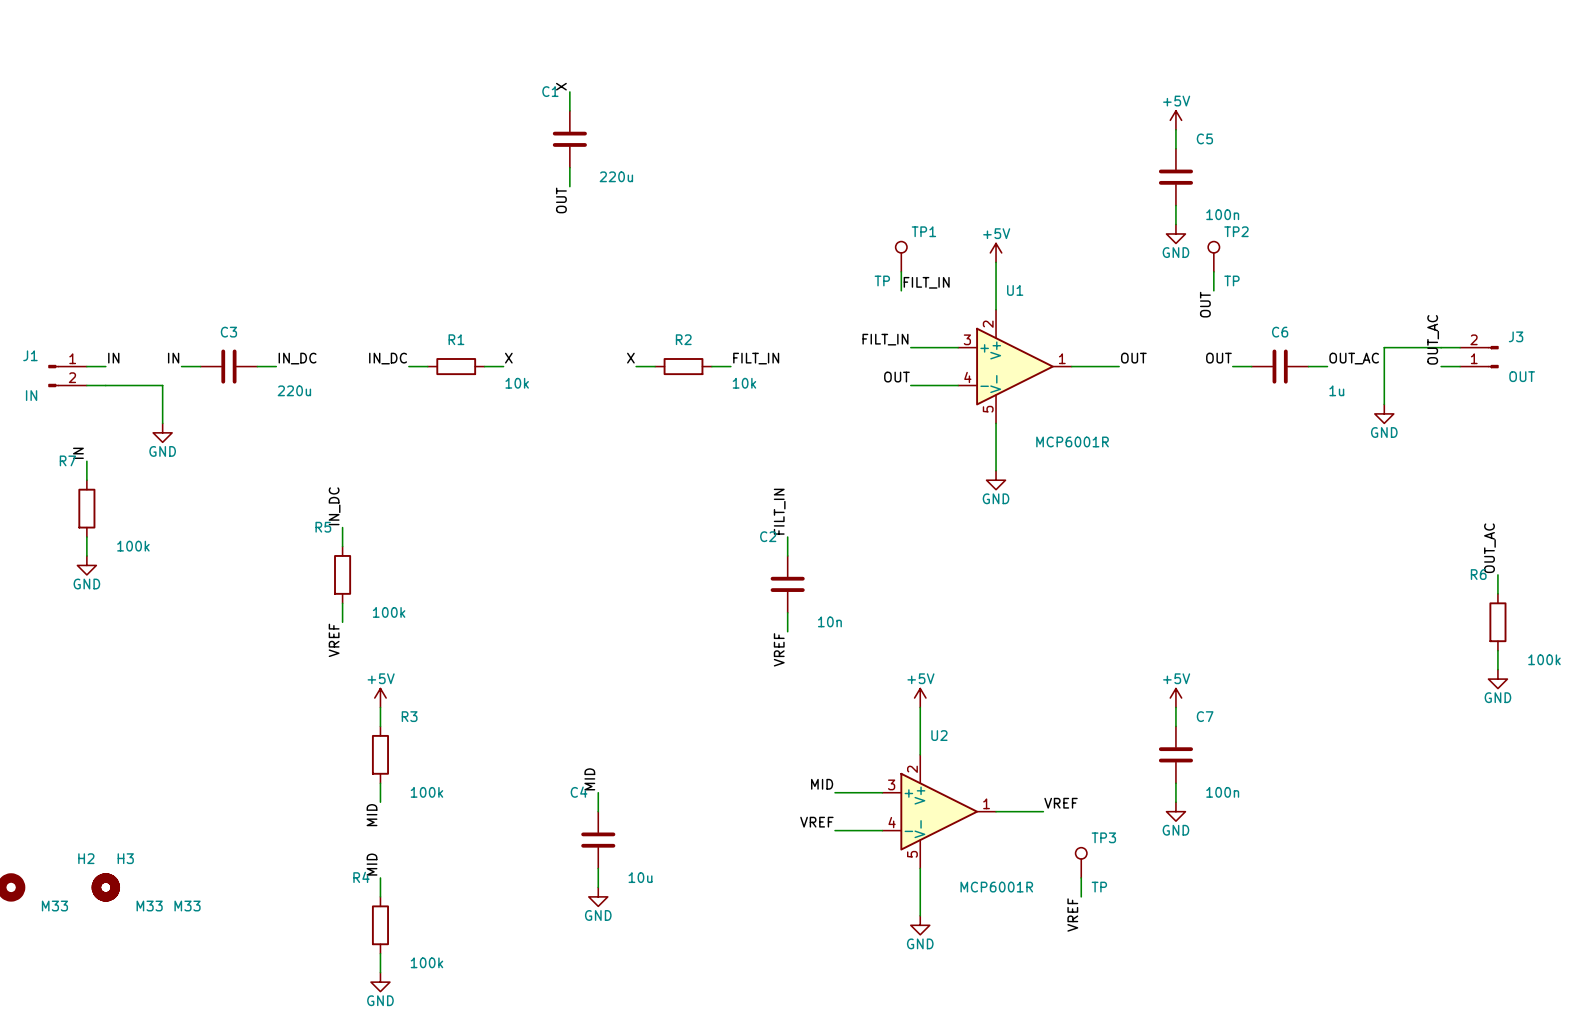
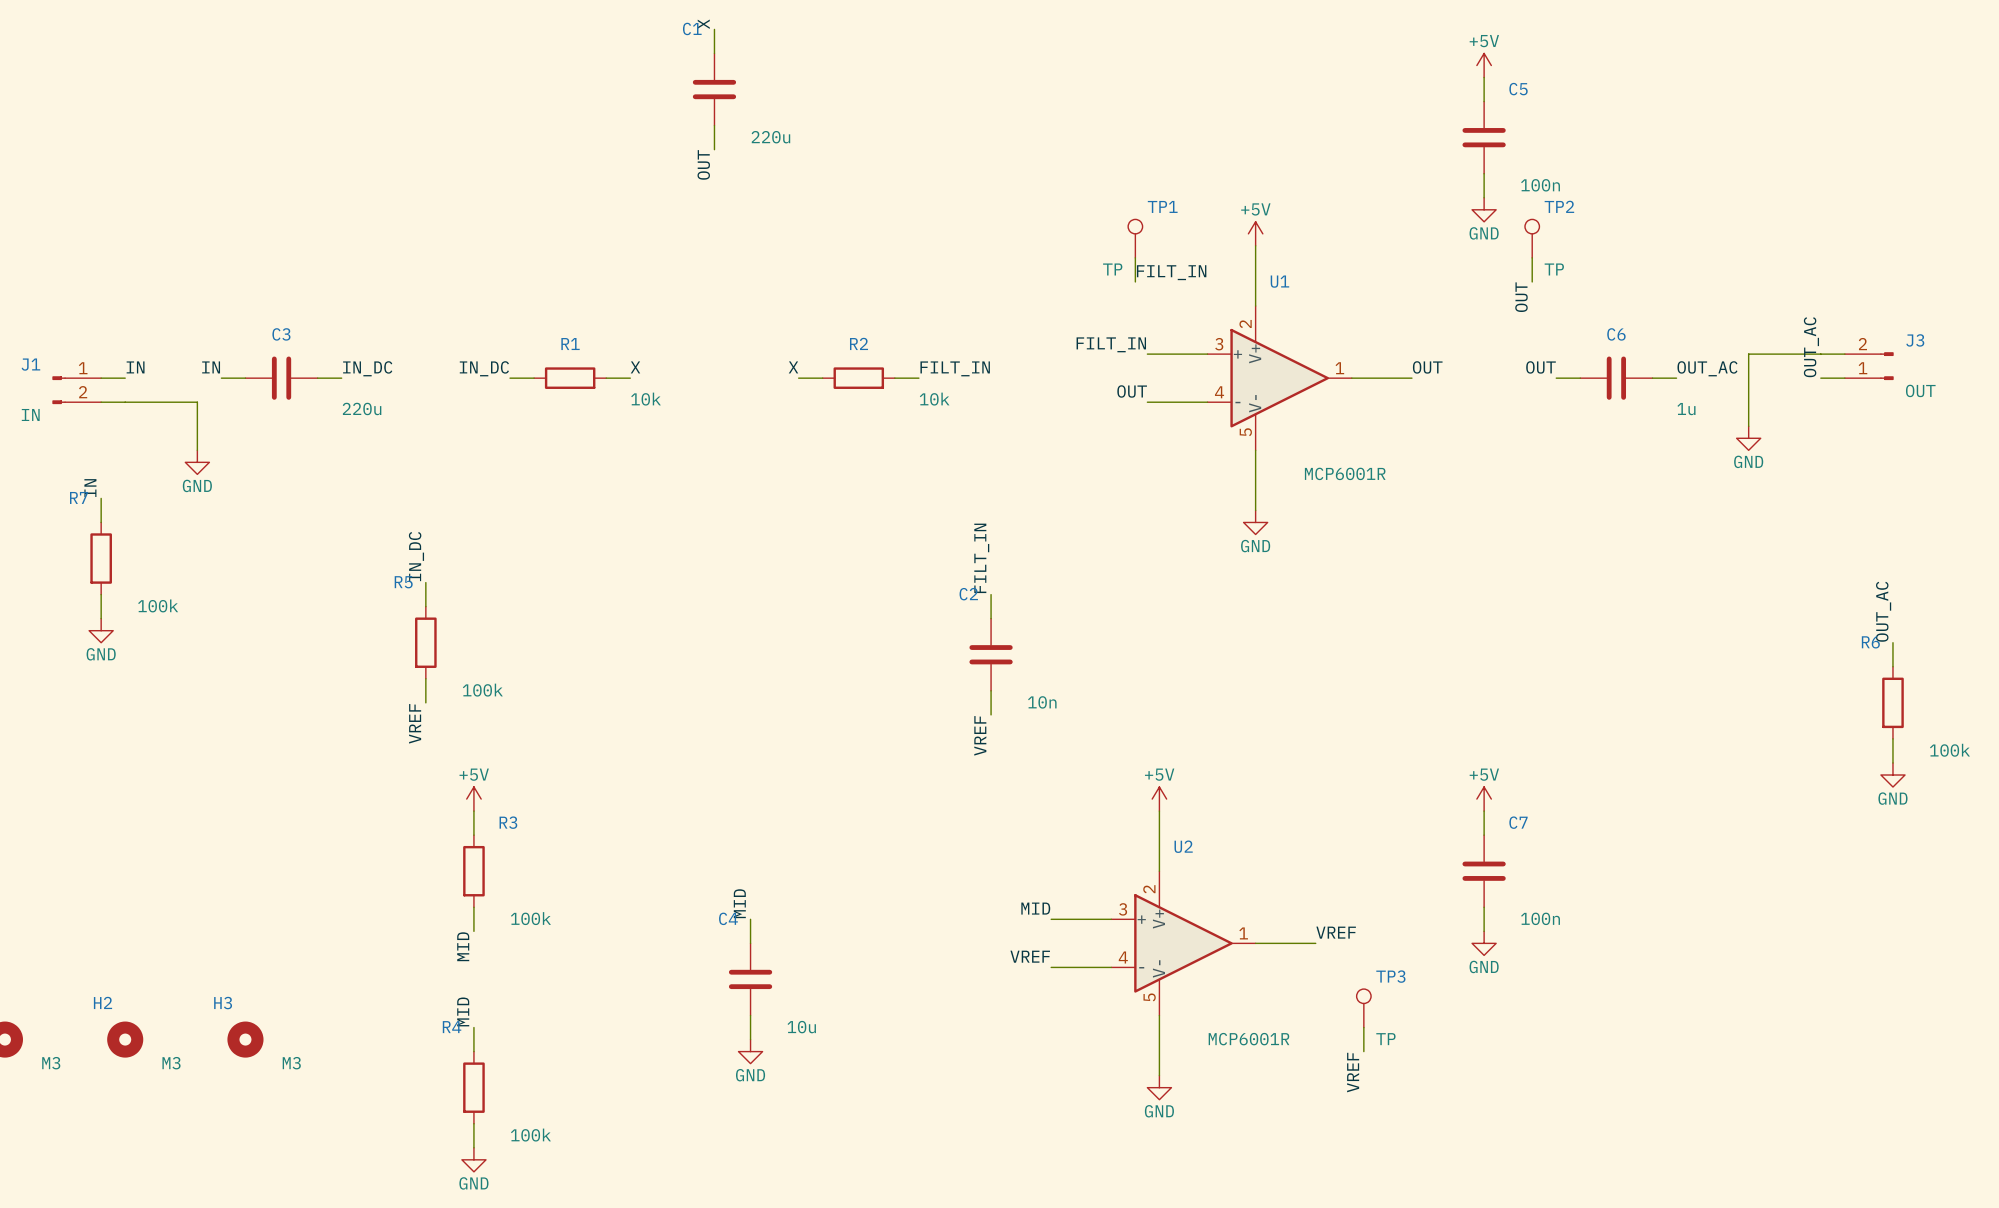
H3 name position: H3 (125, 858) -> H3 (223, 1003)
H3 position: (105, 887) -> (245, 1039)
part value: M33 (54, 906) -> M3 (51, 1063)
H2 value: M33 (149, 906) -> M3 (171, 1063)
H3 value: M33 (187, 906) -> M3 (291, 1063)

